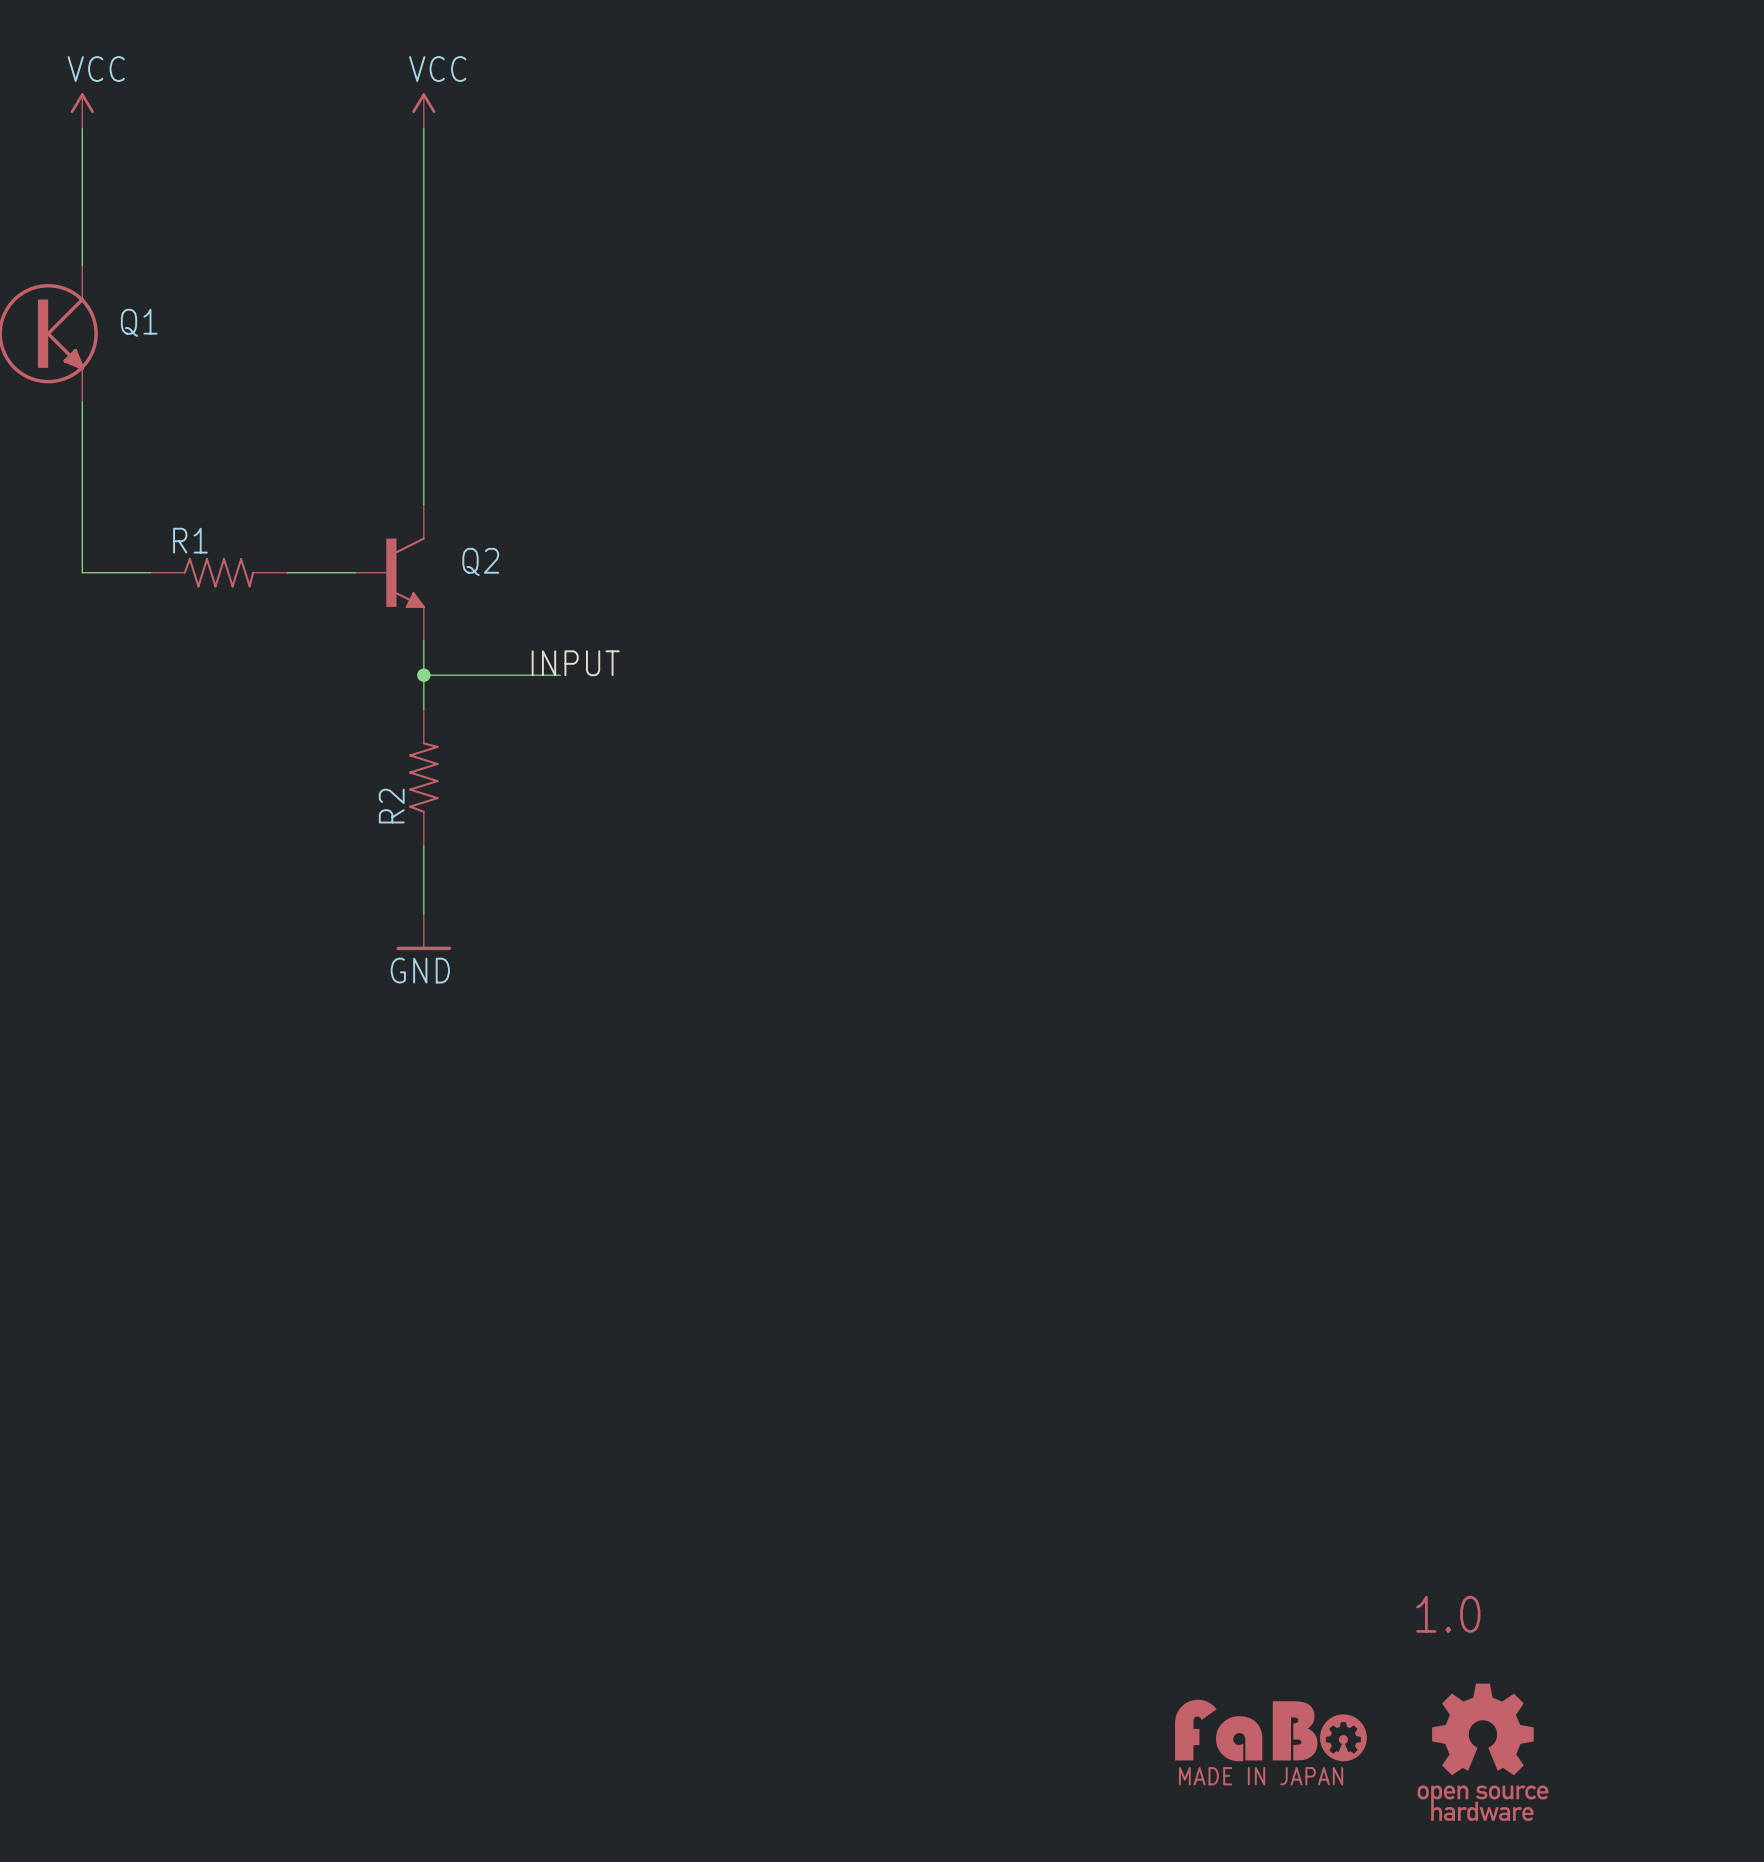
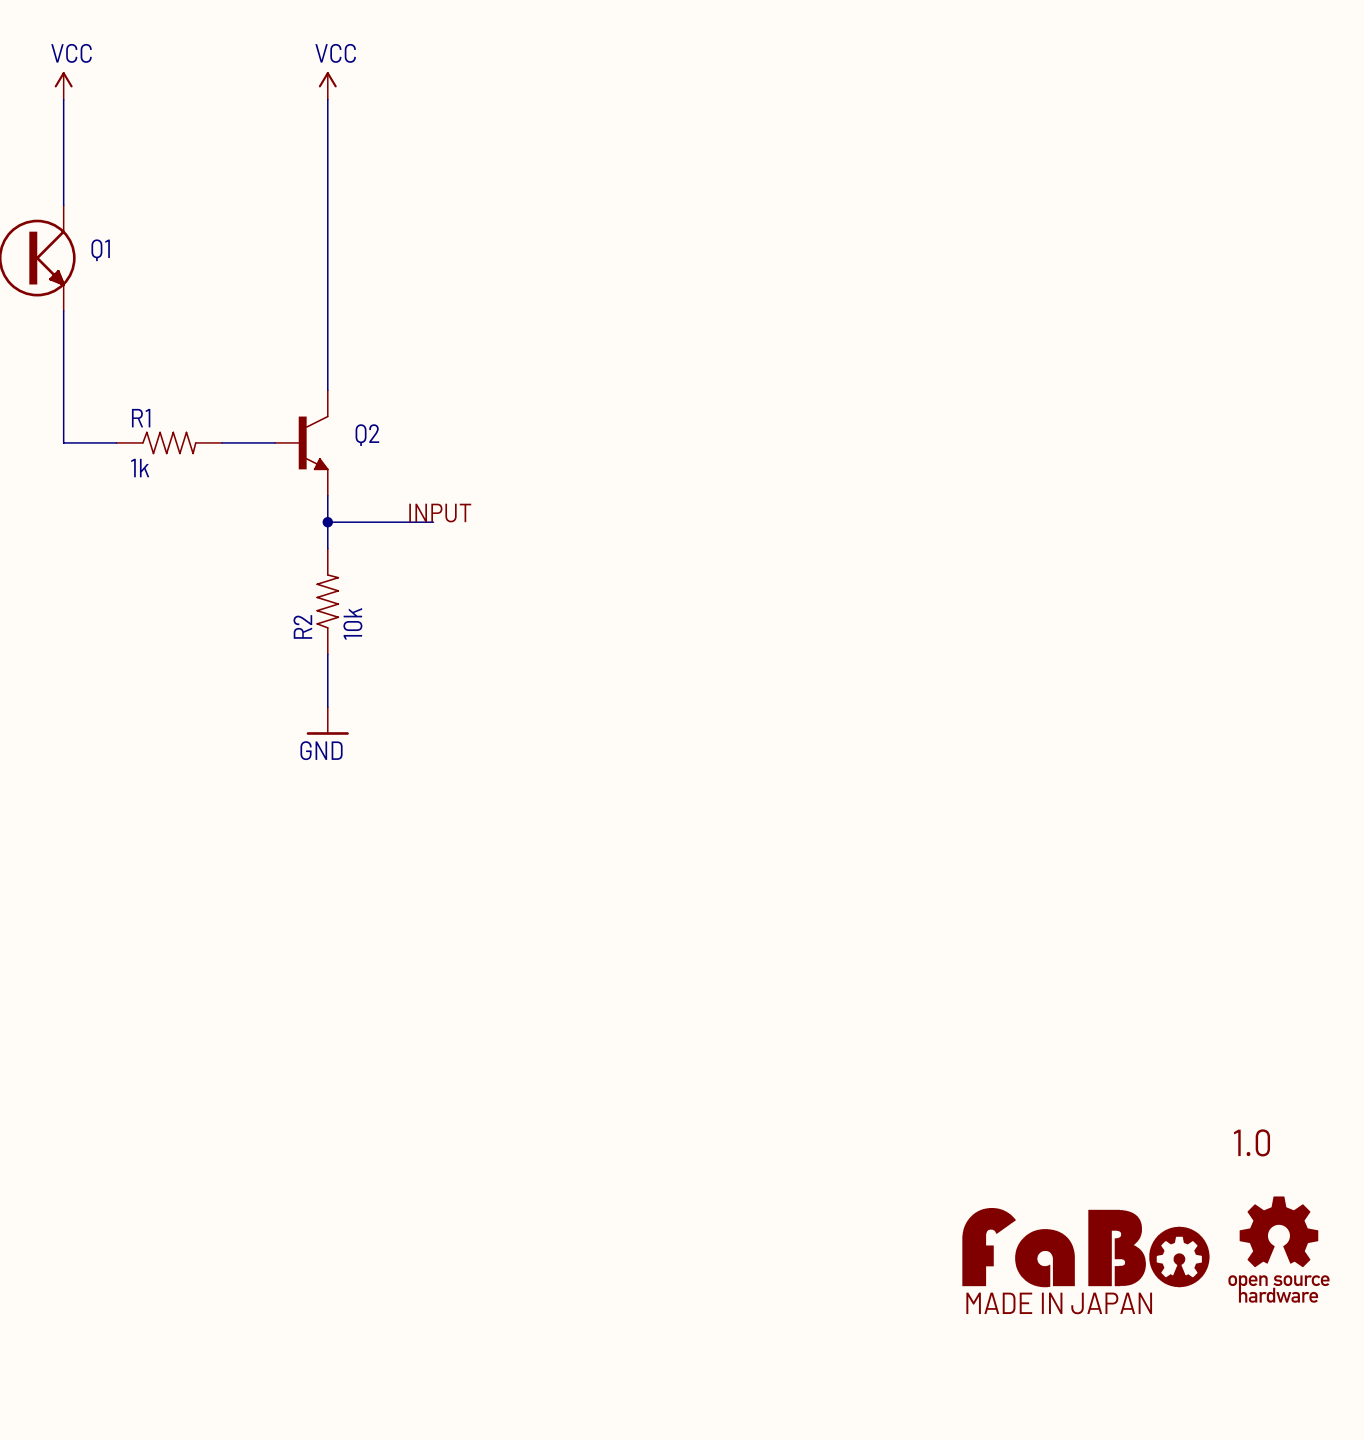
R1 value: none -> 1k (140, 468)
R2 value: none -> 10k (352, 623)
part: none -> (1085, 1247)
text position: 1.0 (1448, 1614) -> 1.0 (1251, 1142)
part: (1270, 1730) -> none
part position: (1482, 1752) -> (1278, 1249)

